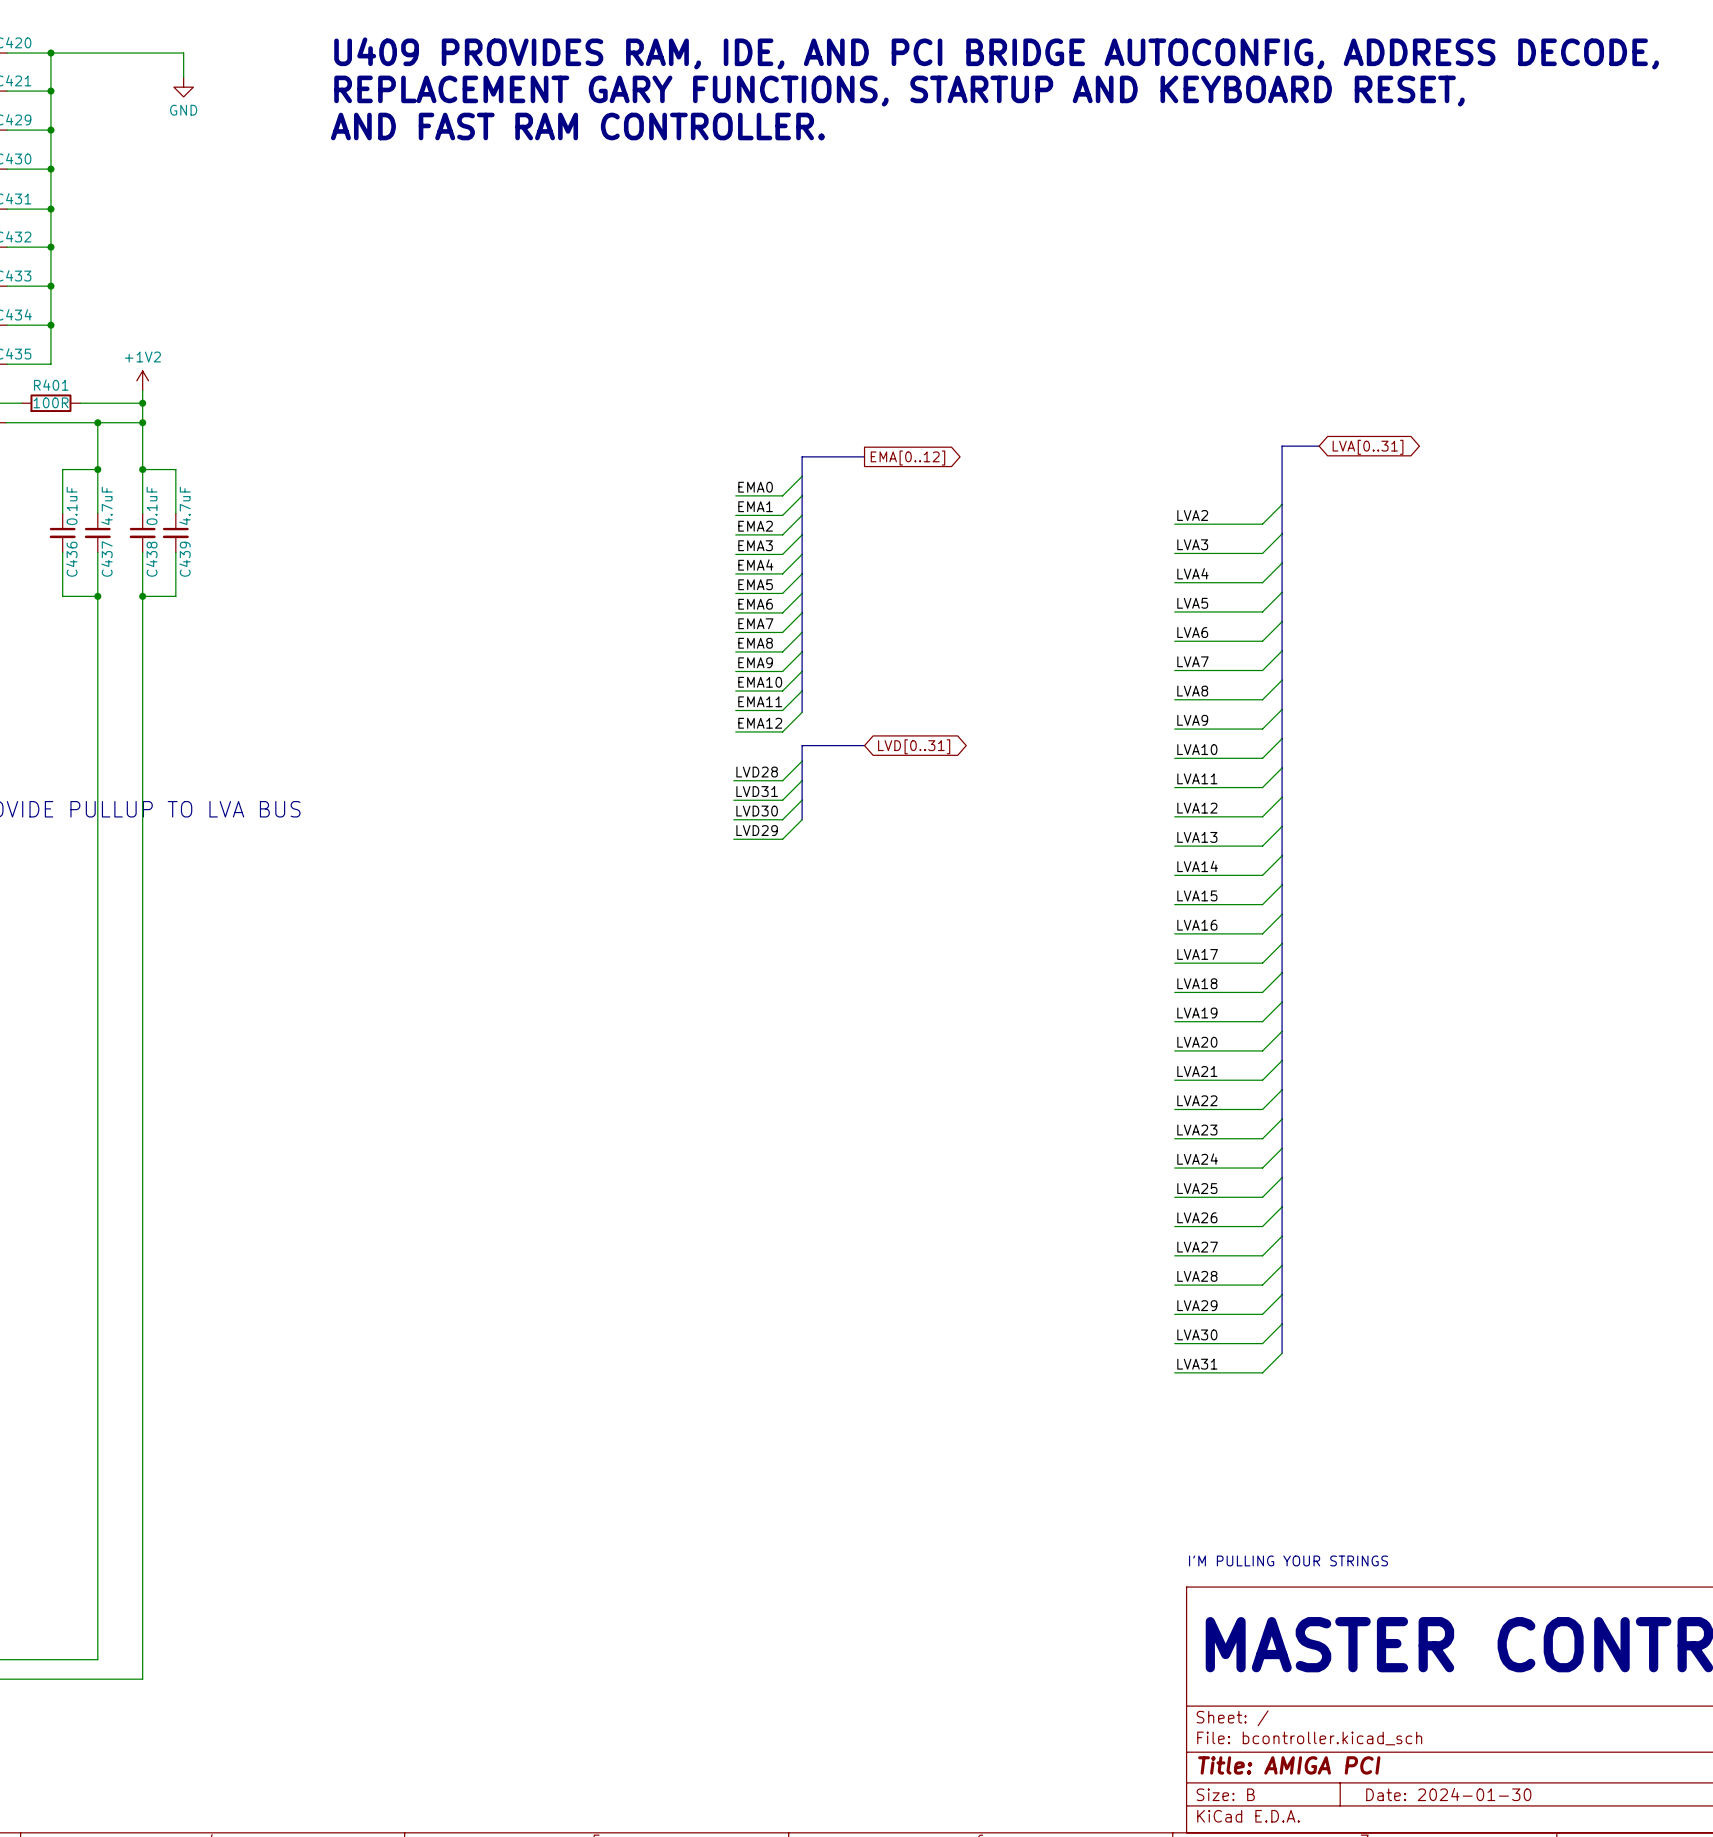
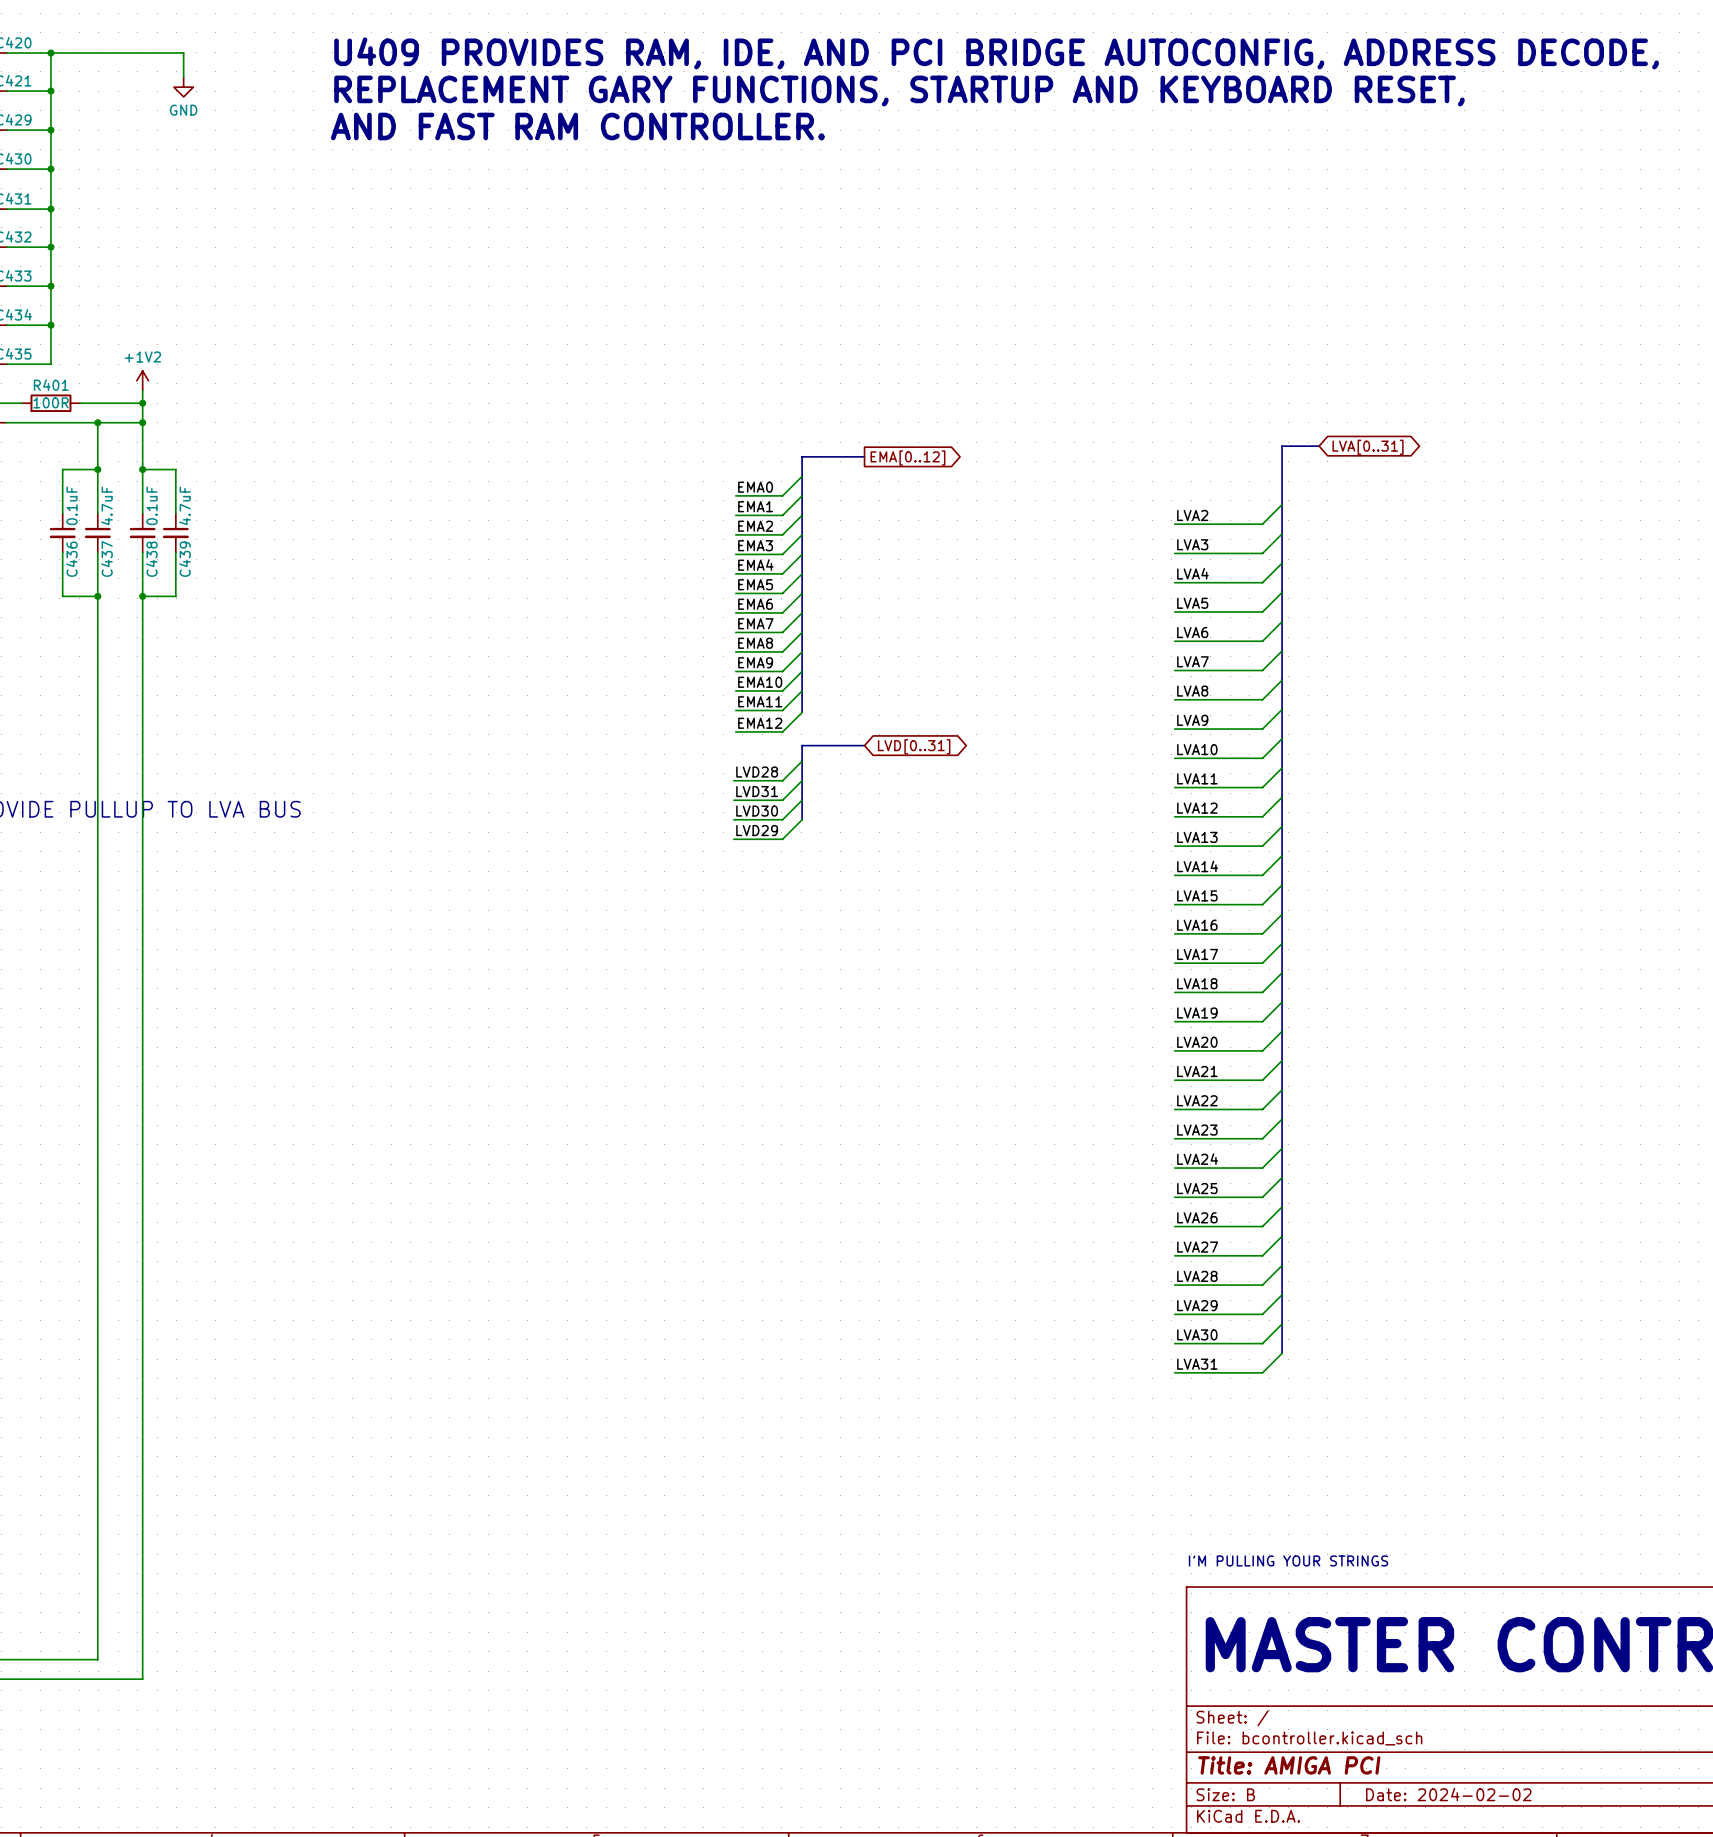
title block: Date: 2024-01-30 (1448, 1794) -> Date: 2024-02-02 (1448, 1794)

